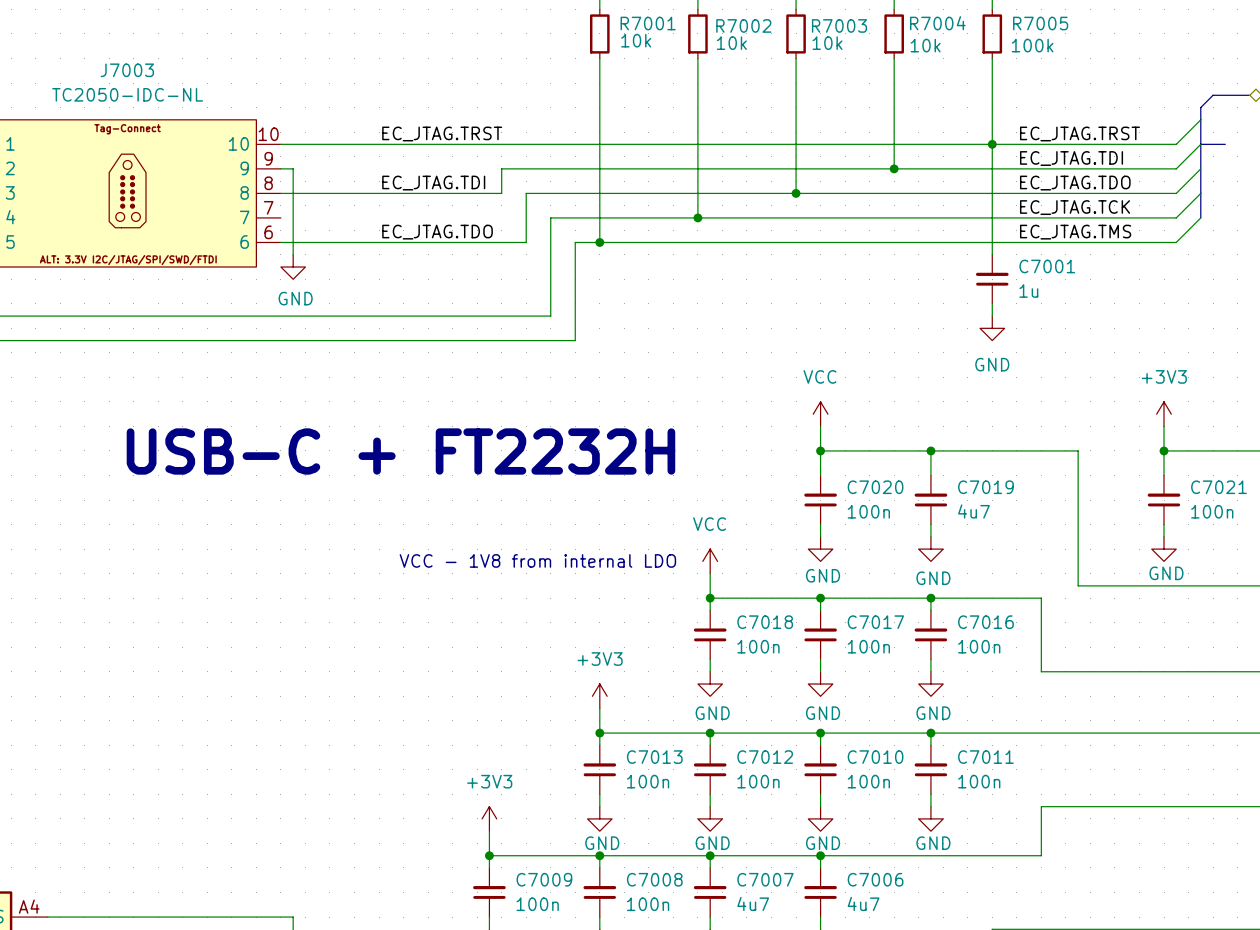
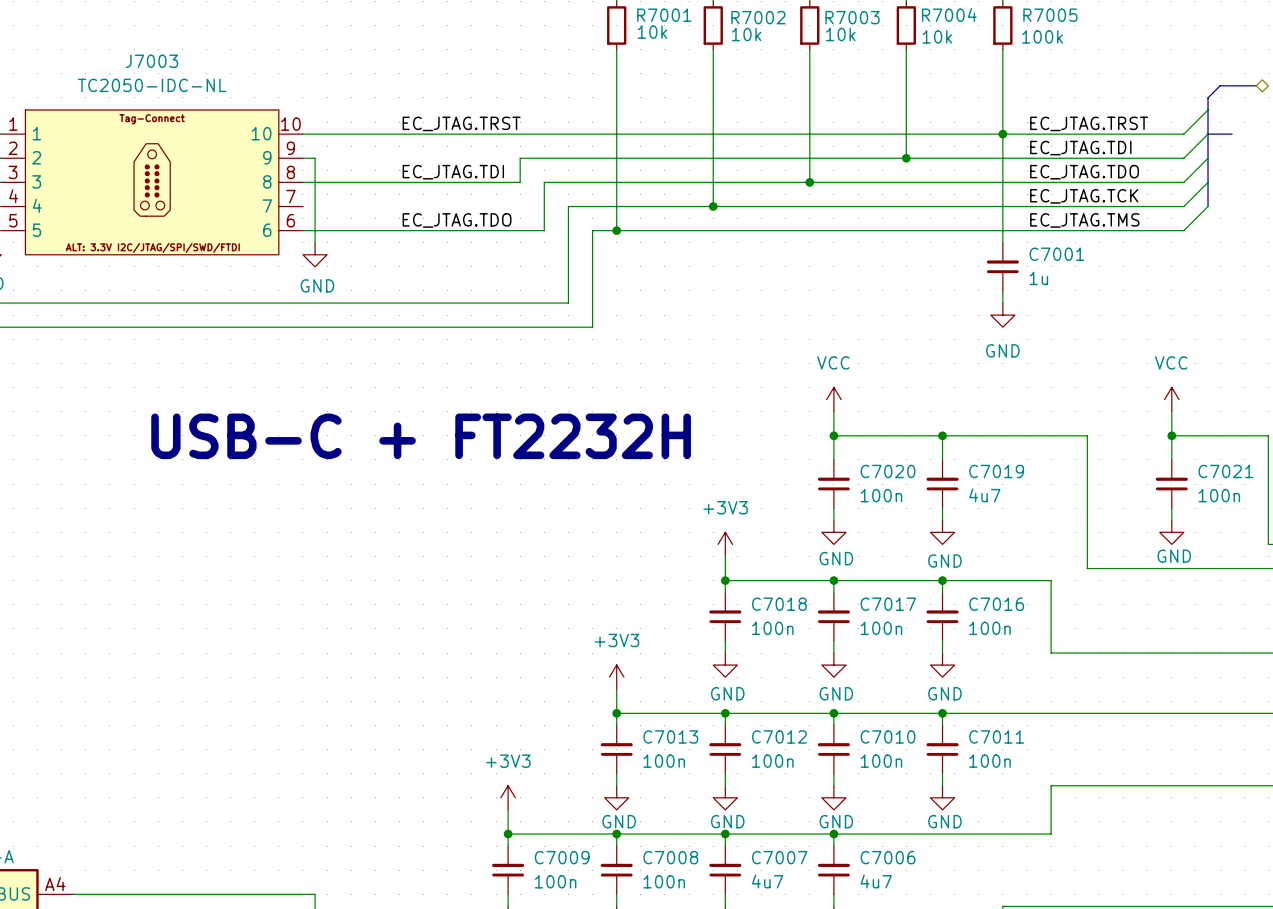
power symbol: +3V3 (1164, 414) -> VCC (1171, 399)
text: VCC - 1V8 from internal LDO (537, 560) -> none
power symbol: VCC (710, 561) -> +3V3 (725, 544)

